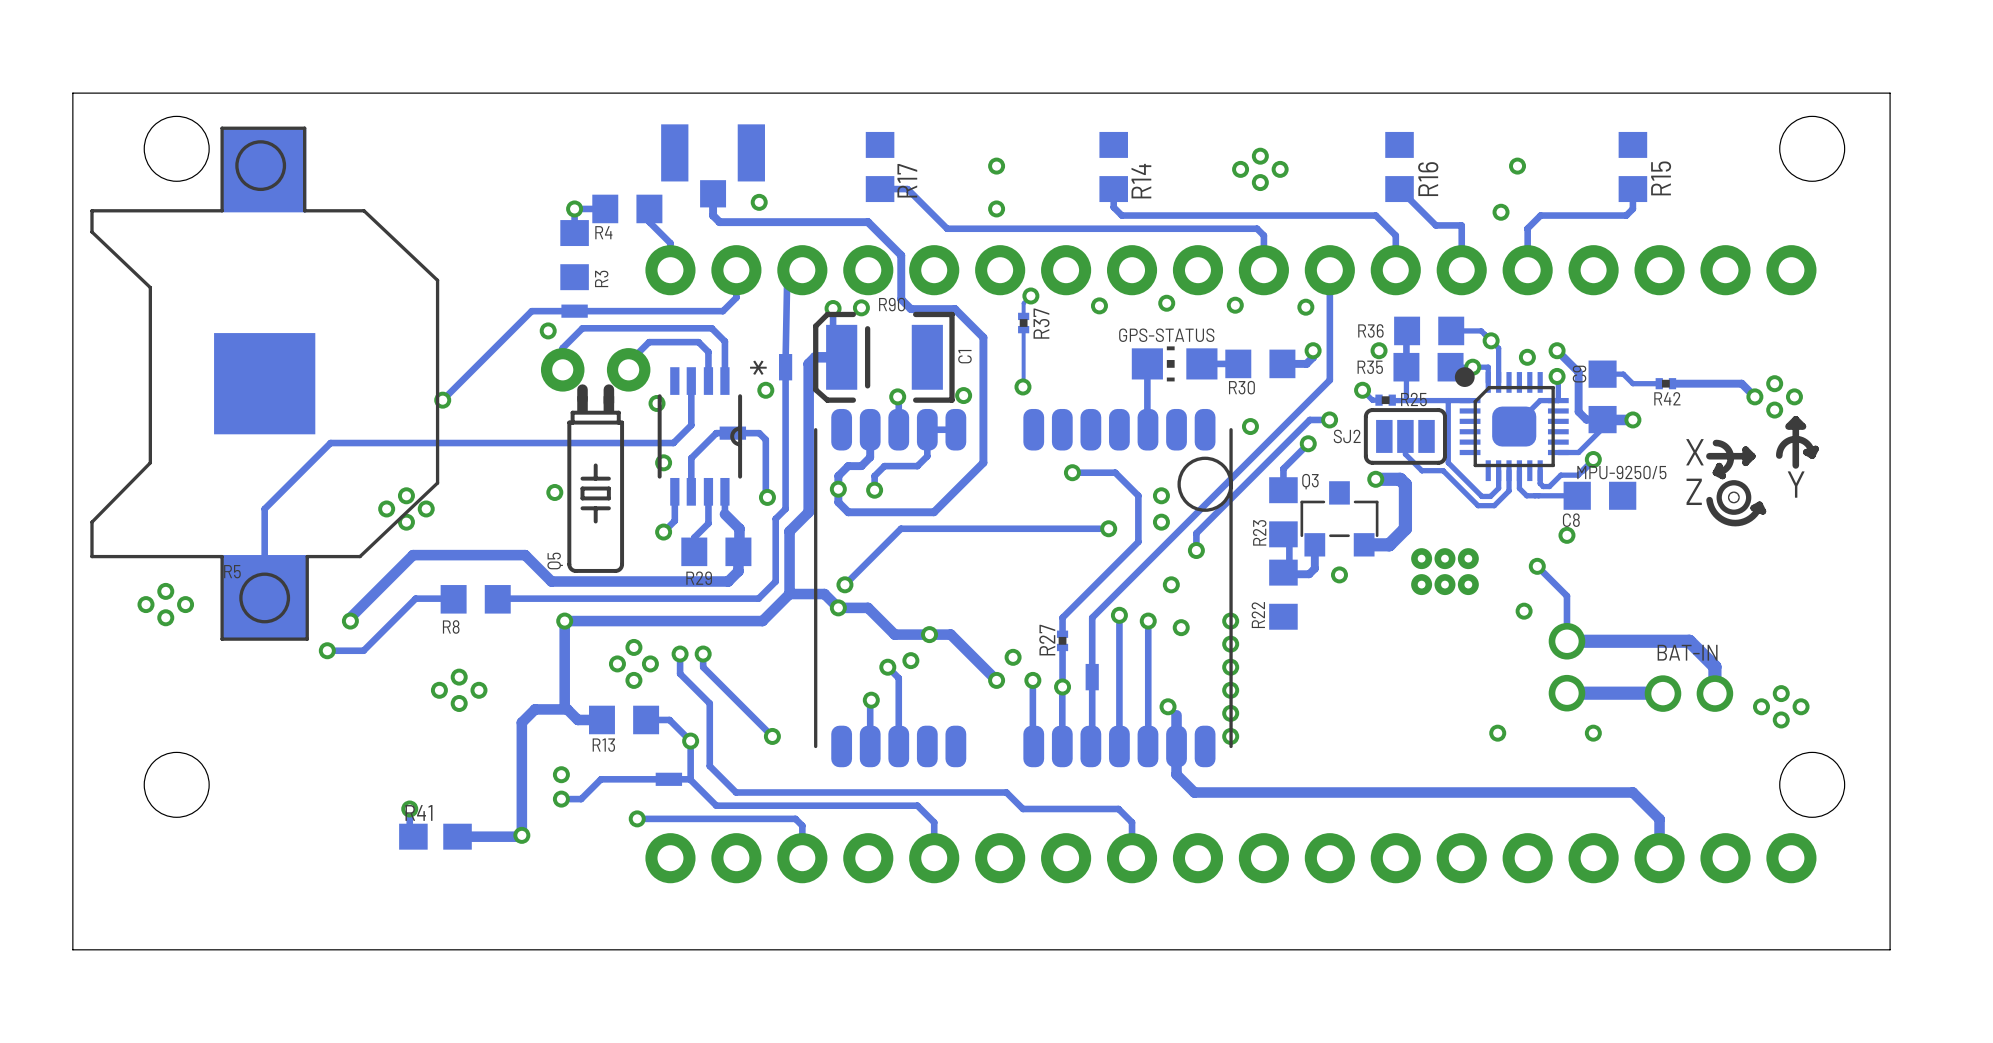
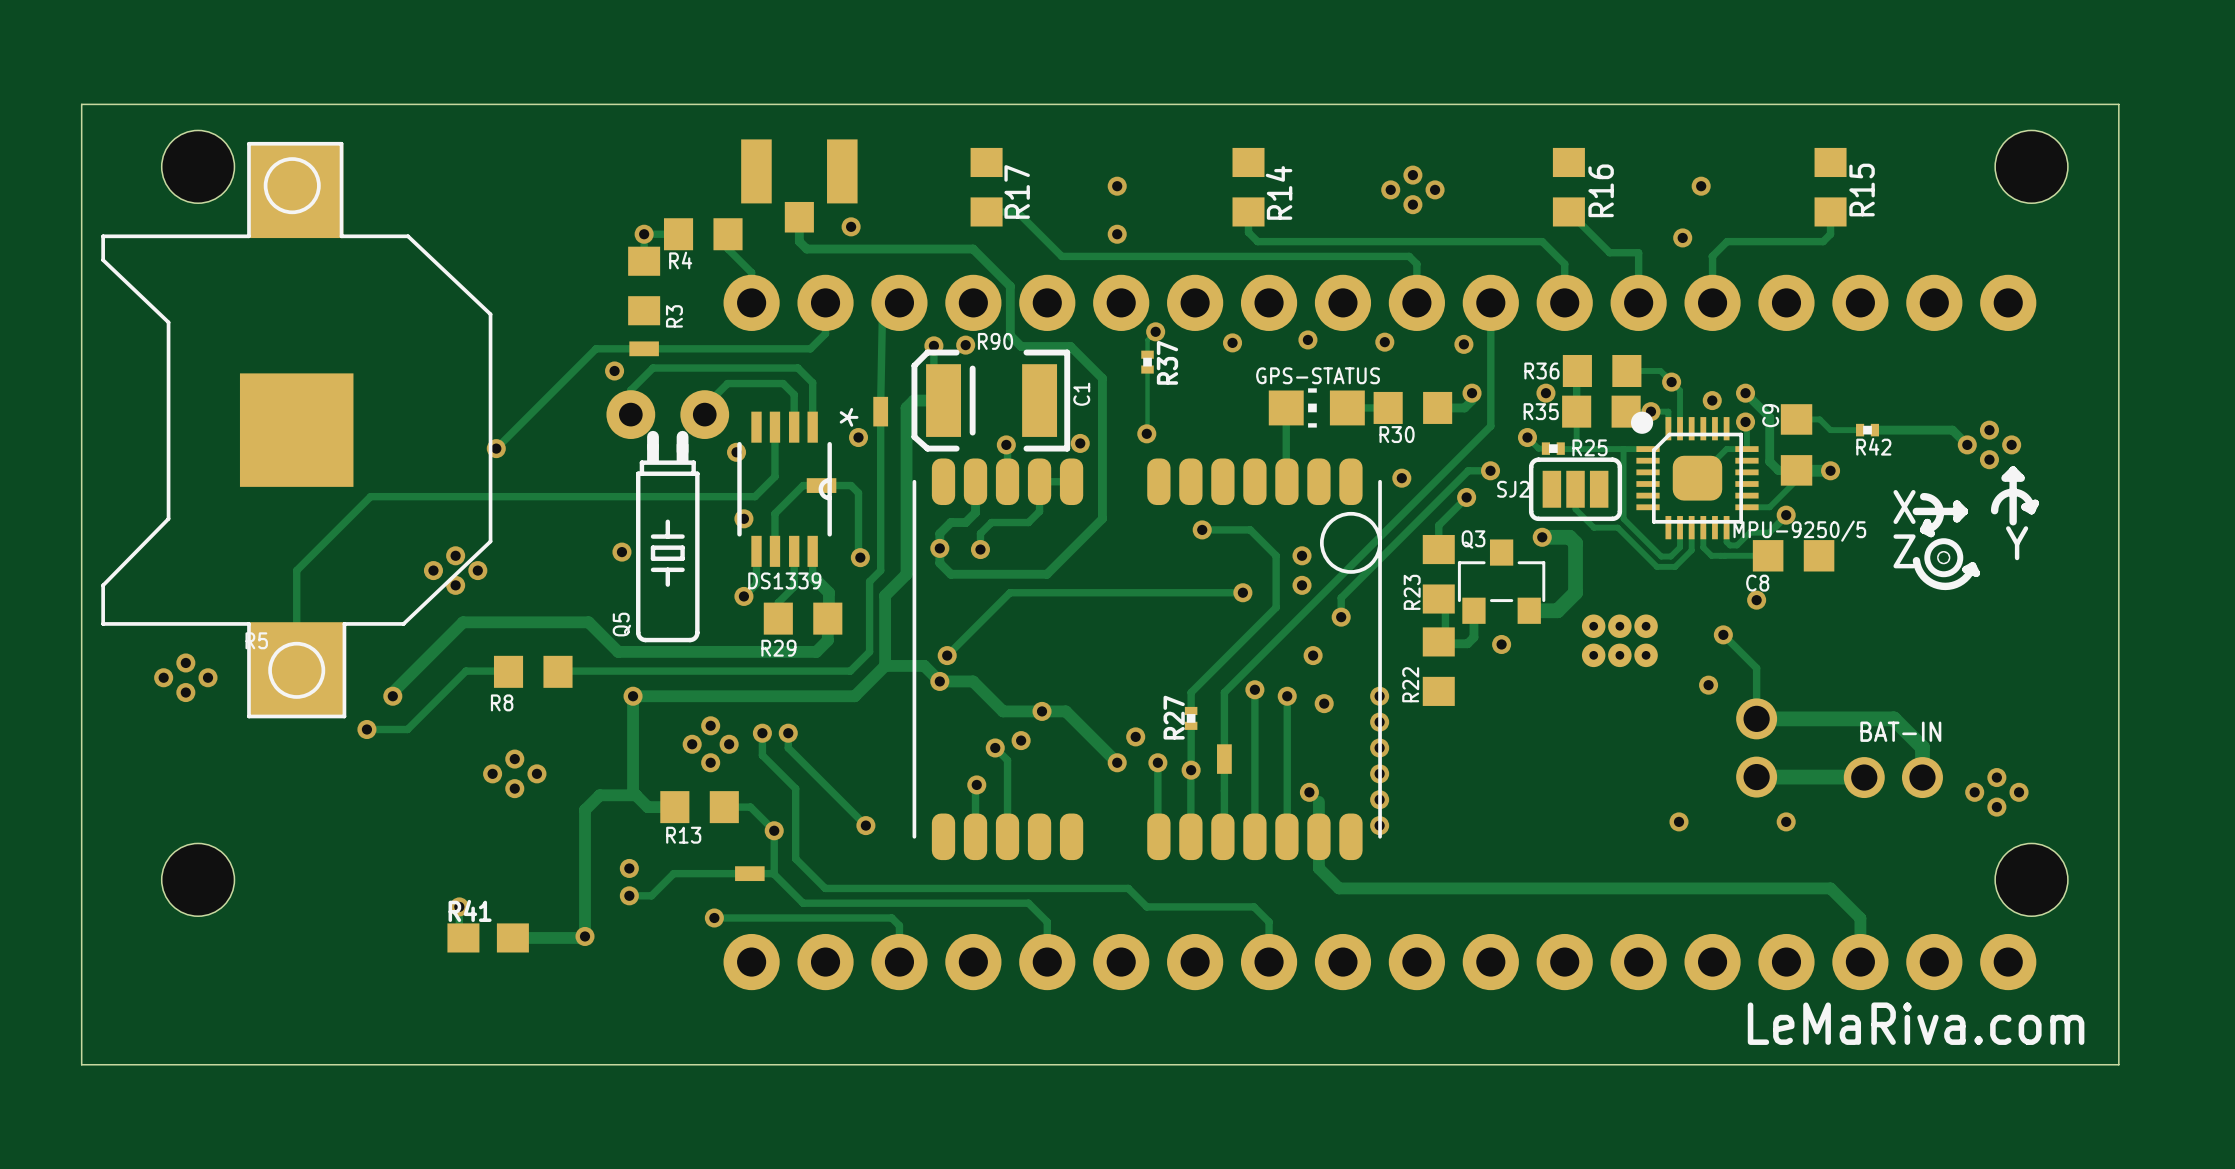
part value: none -> DS1339 (784, 580)
text: none -> LeMaRiva.com (1916, 1023)

